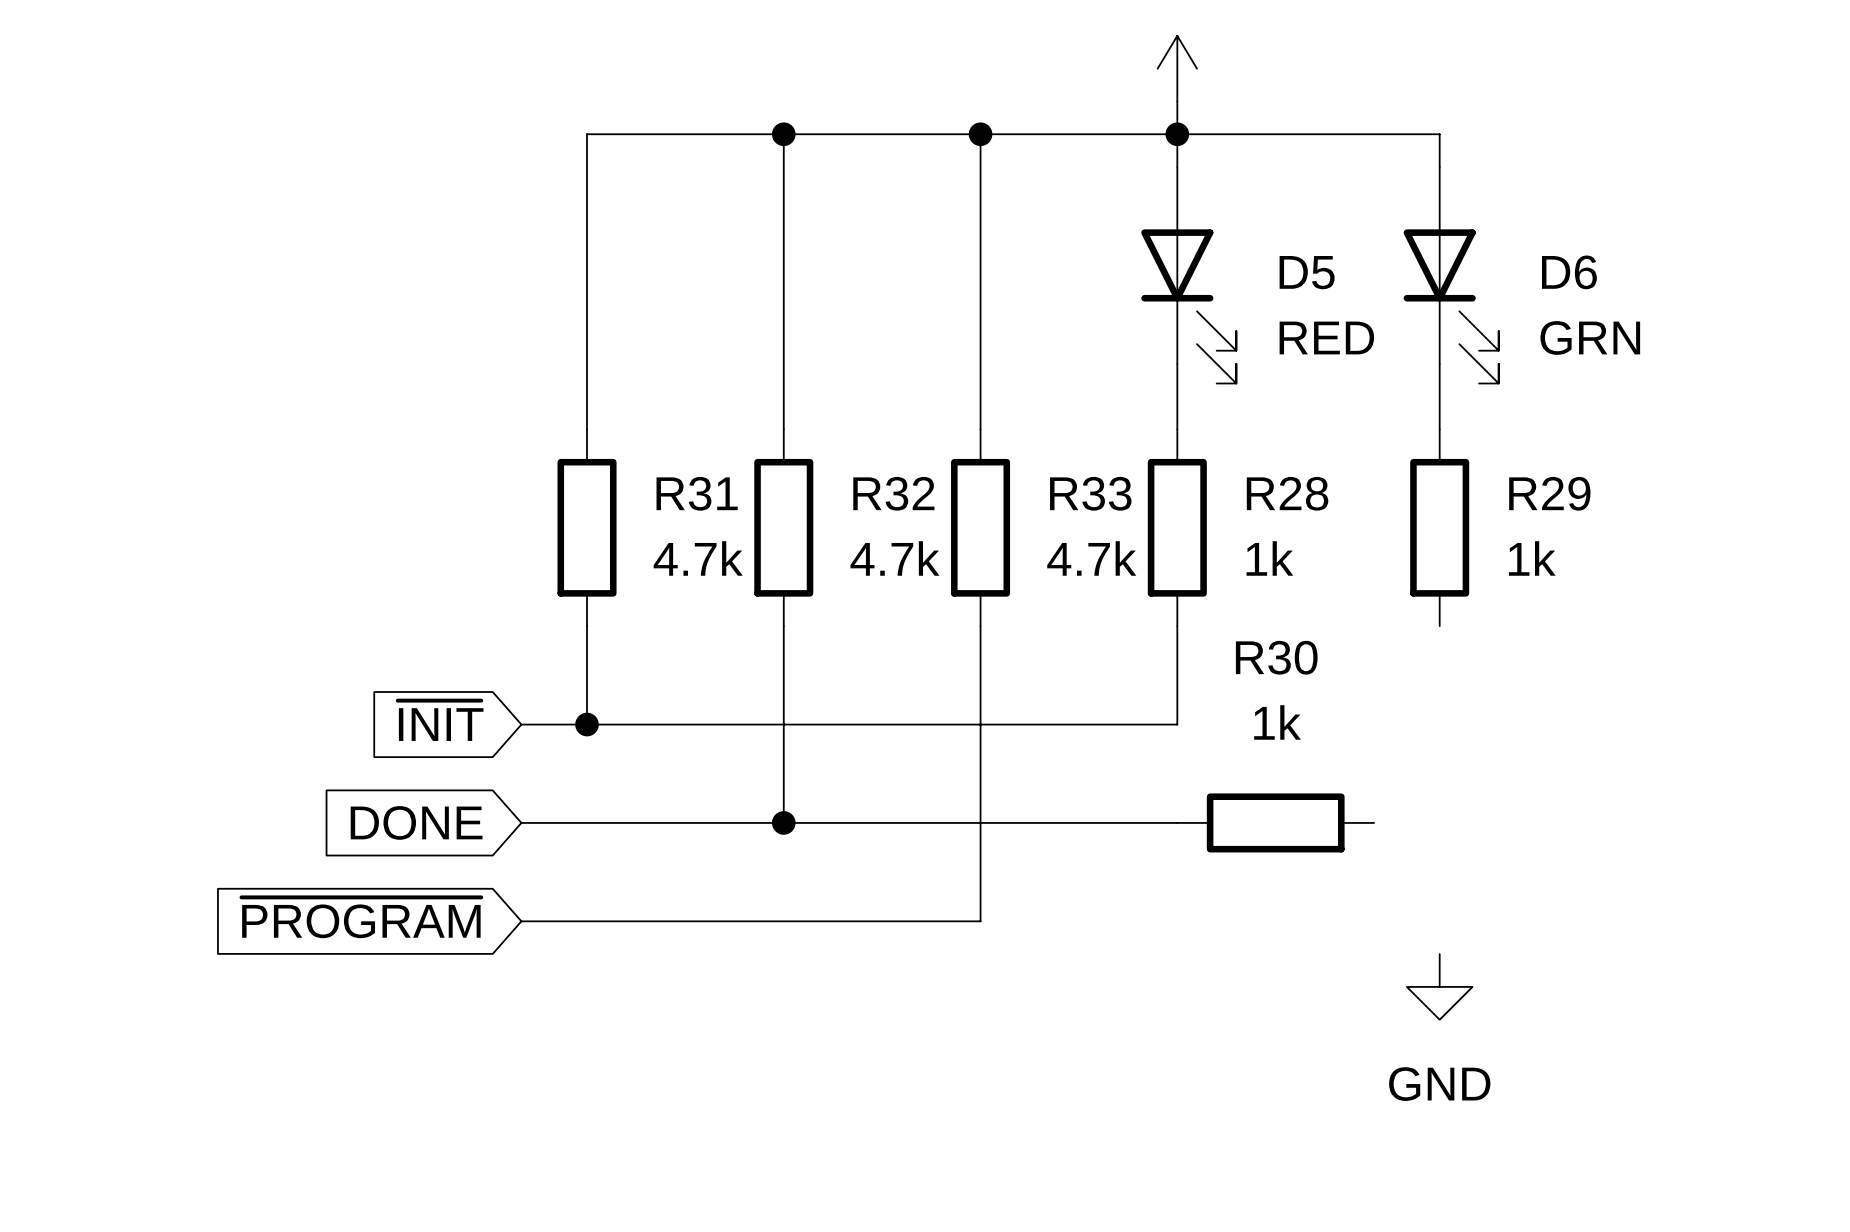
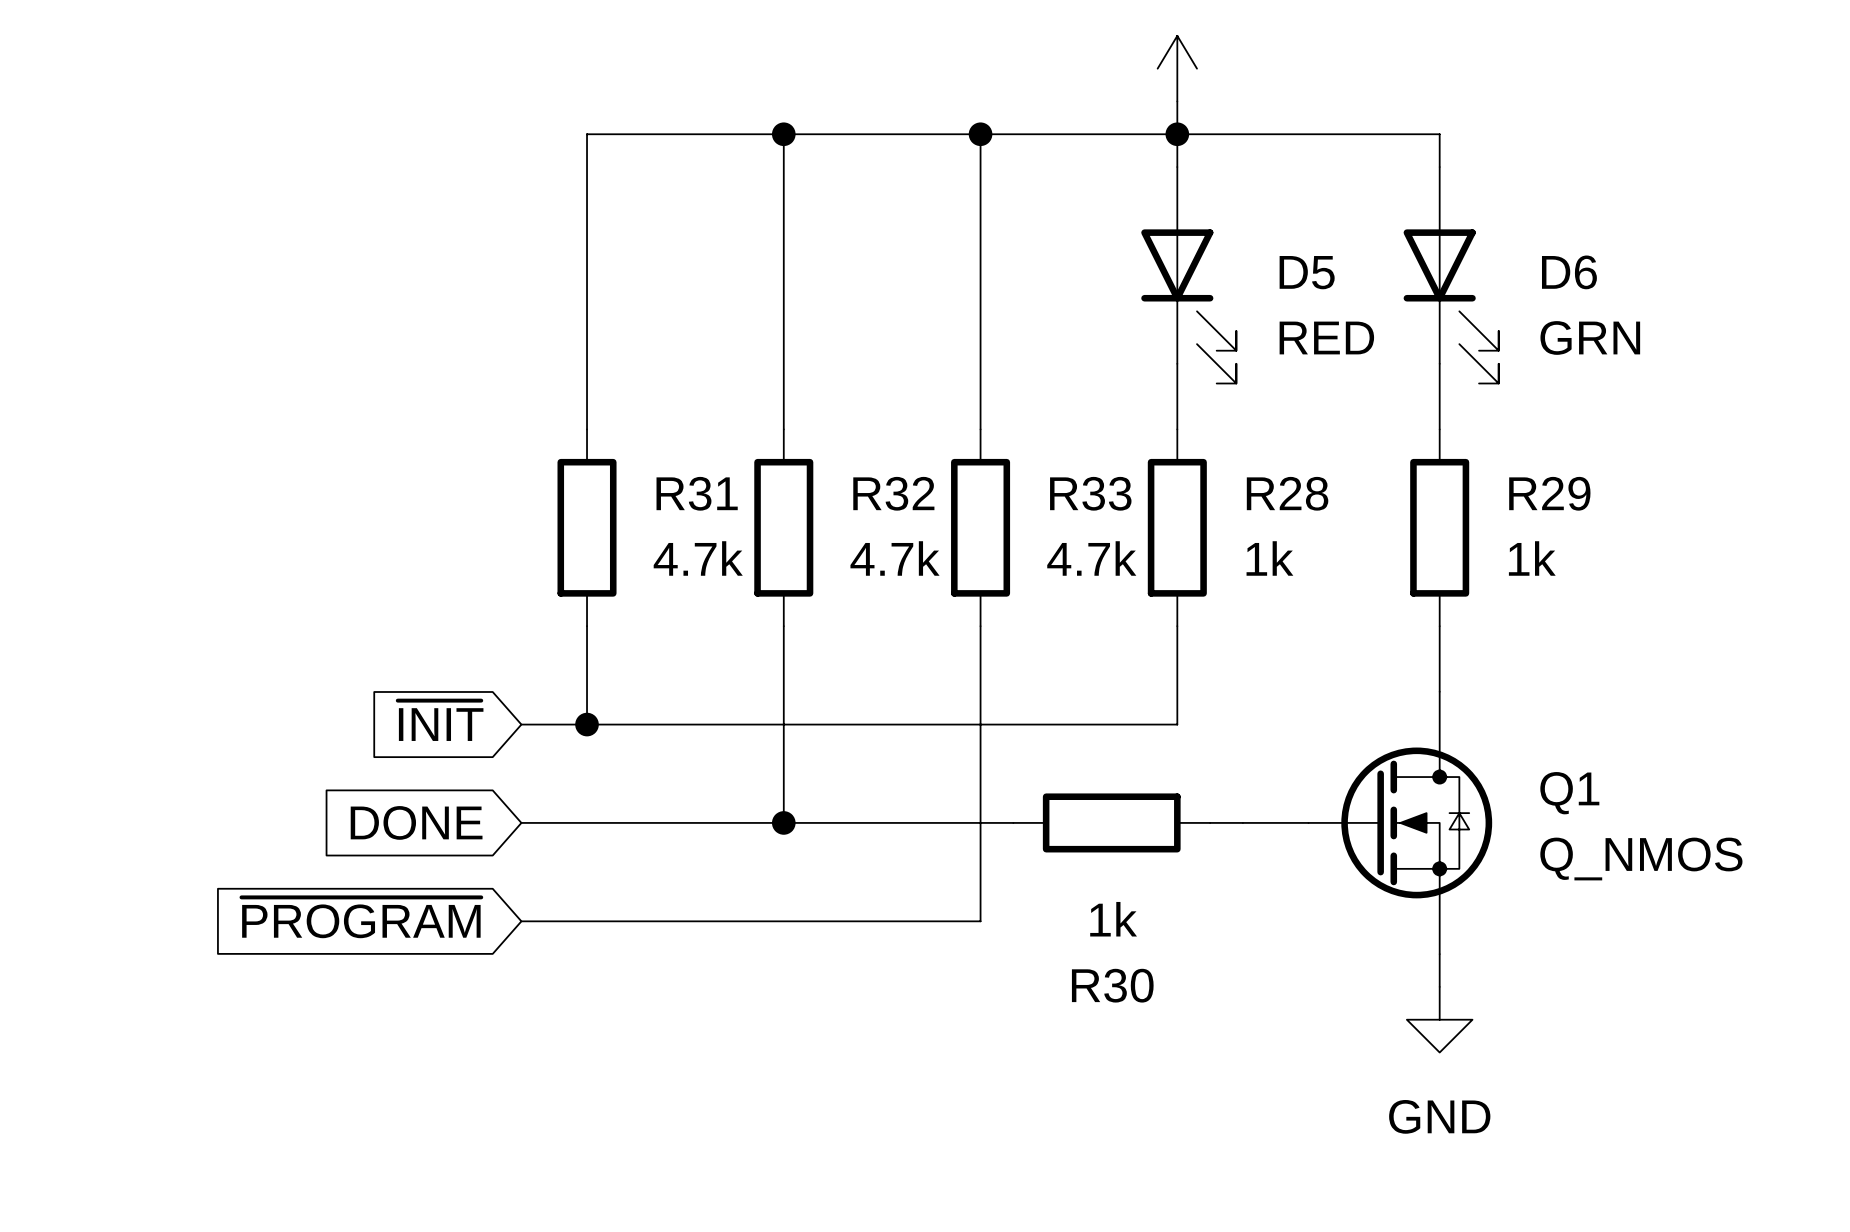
wire: none -> (1439, 626) (1439, 691)
R30 name position: R30 (1276, 657) -> R30 (1112, 985)
R30 value position: 1k (1277, 722) -> 1k (1113, 919)
wire: (1013, 822) (1177, 822) -> none
wire: none -> (1210, 822) (1242, 822)
R30 position: (1275, 822) -> (1111, 822)
Q1: none -> Q_NMOS (1367, 822)
power symbol position: GND (1439, 986) -> GND (1439, 1019)

